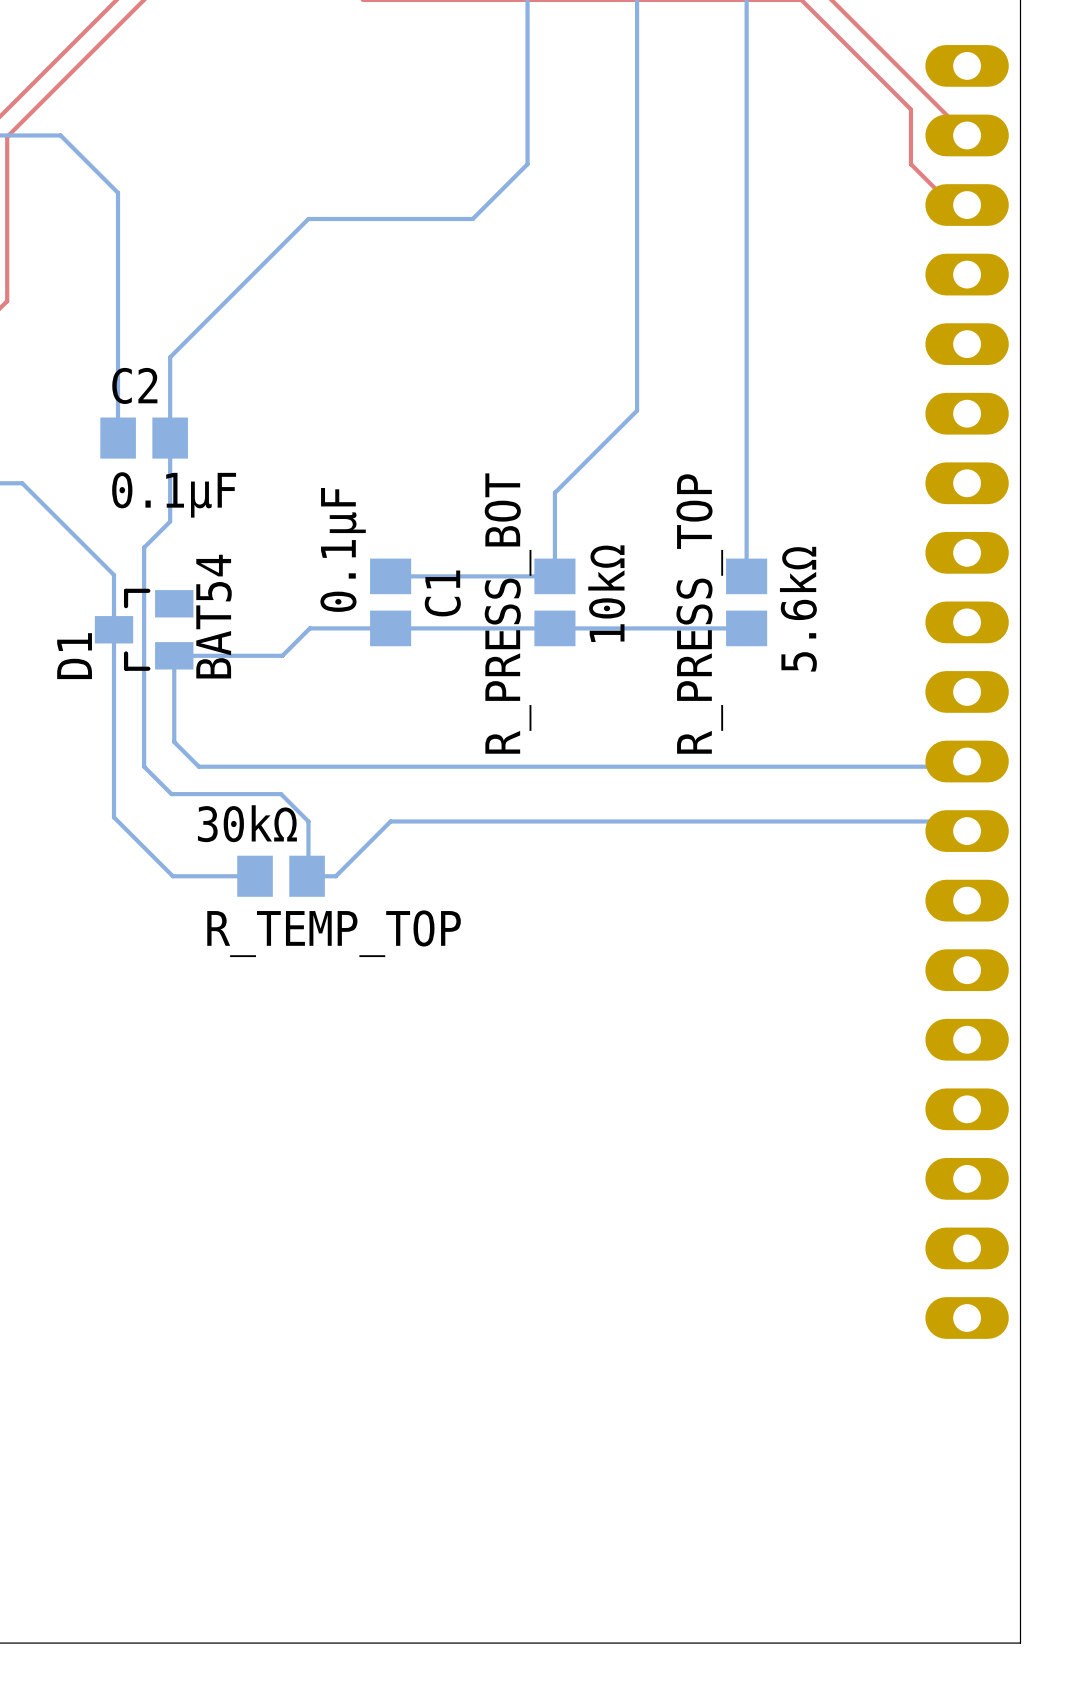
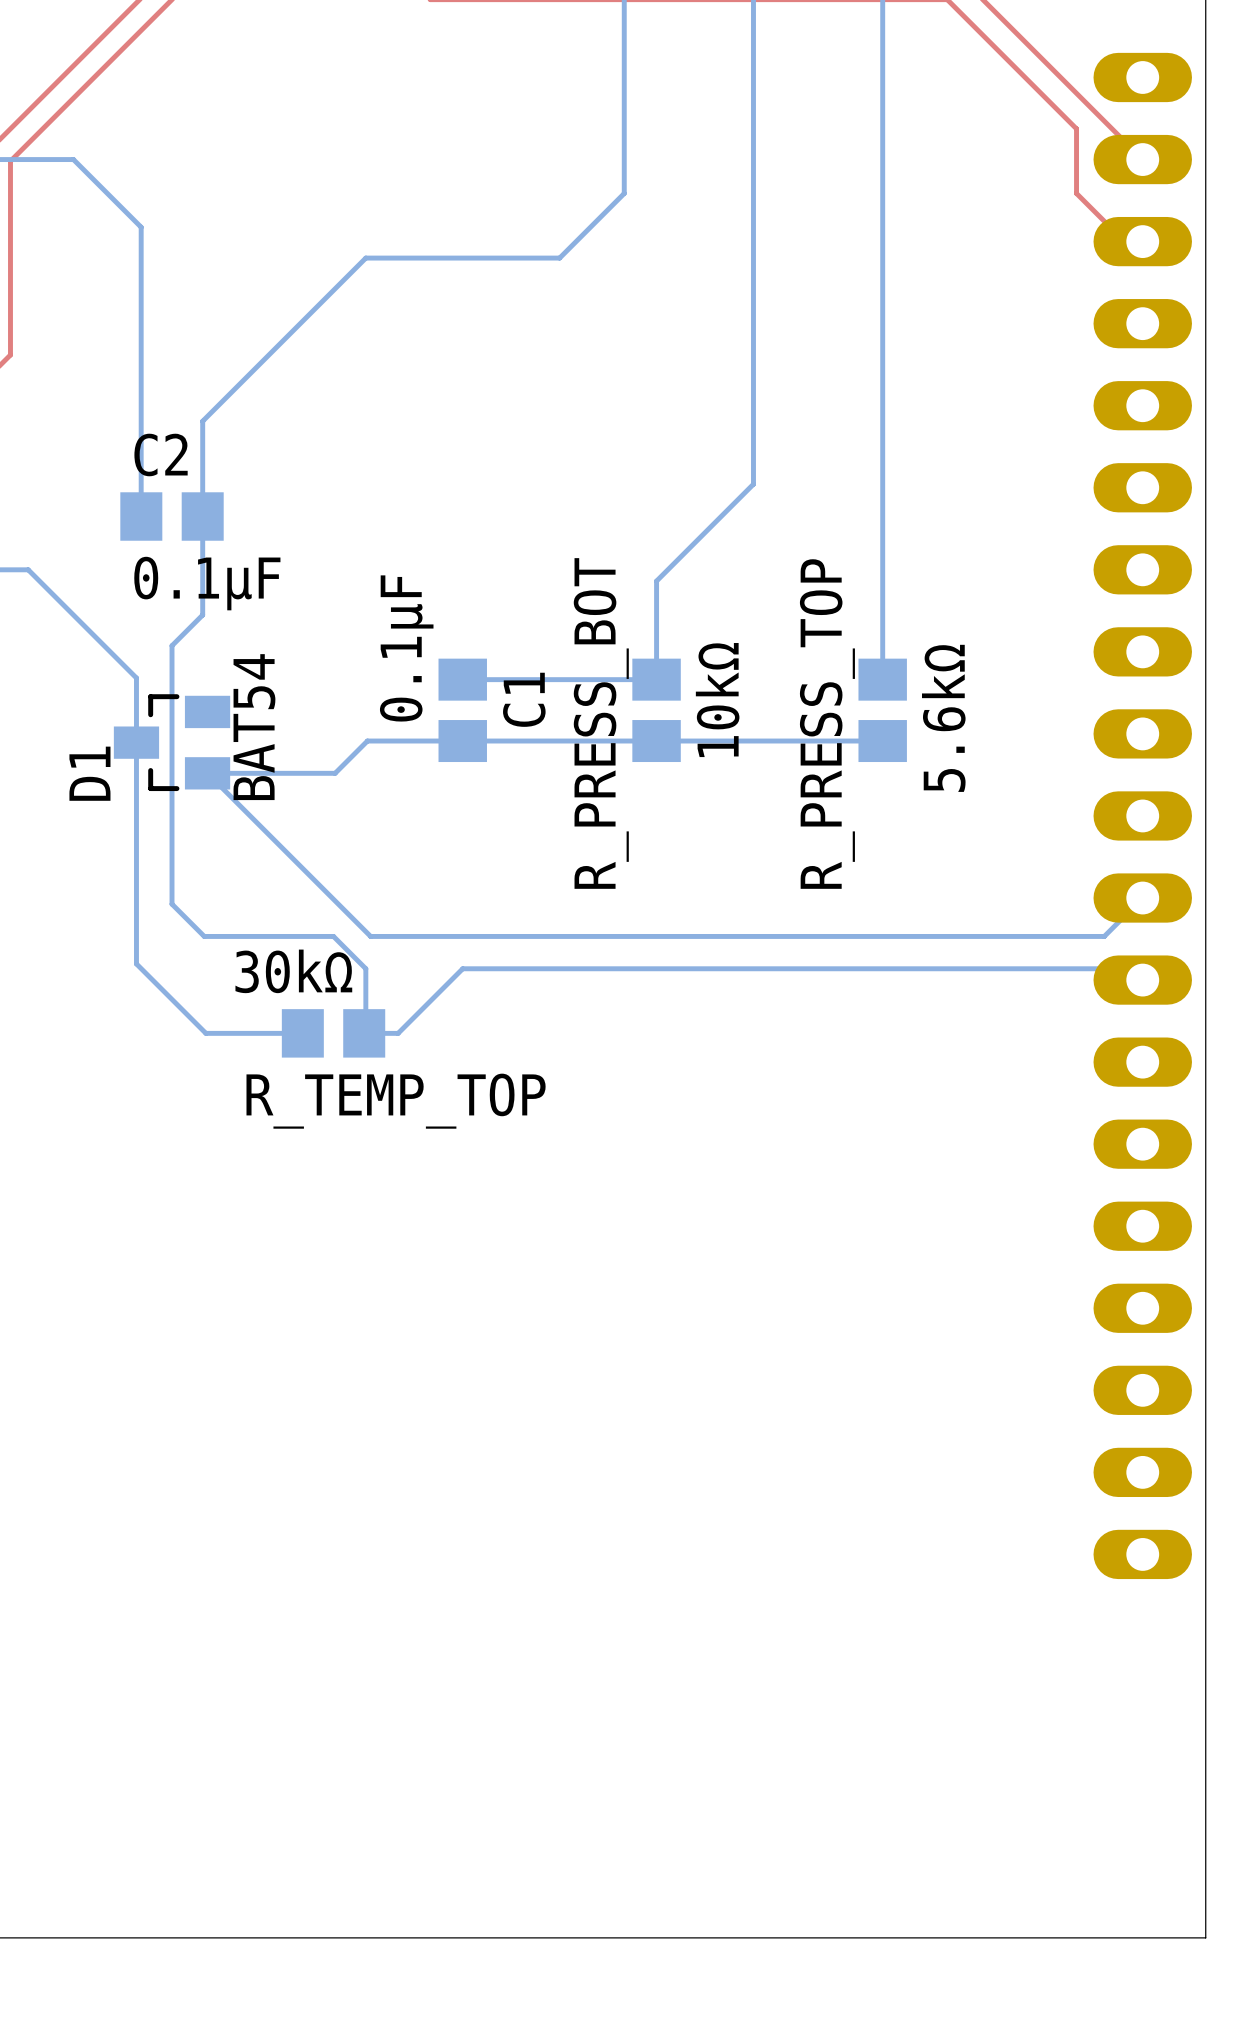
bottom track: (174, 655) (174, 742) (198, 766) (961, 766) -> (207, 773) (370, 936) (1104, 936) (1136, 904)

